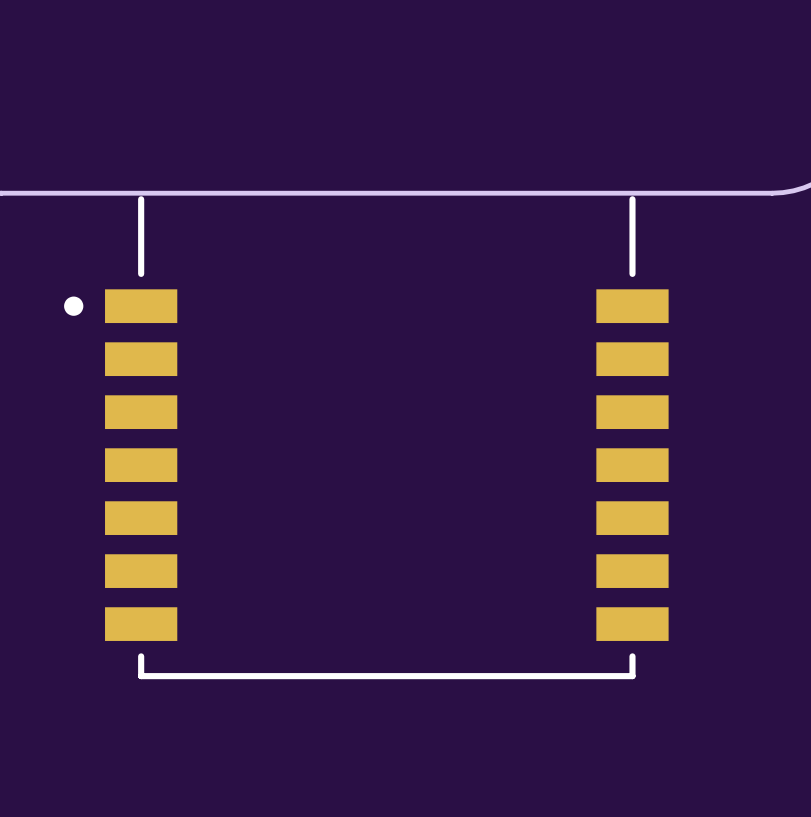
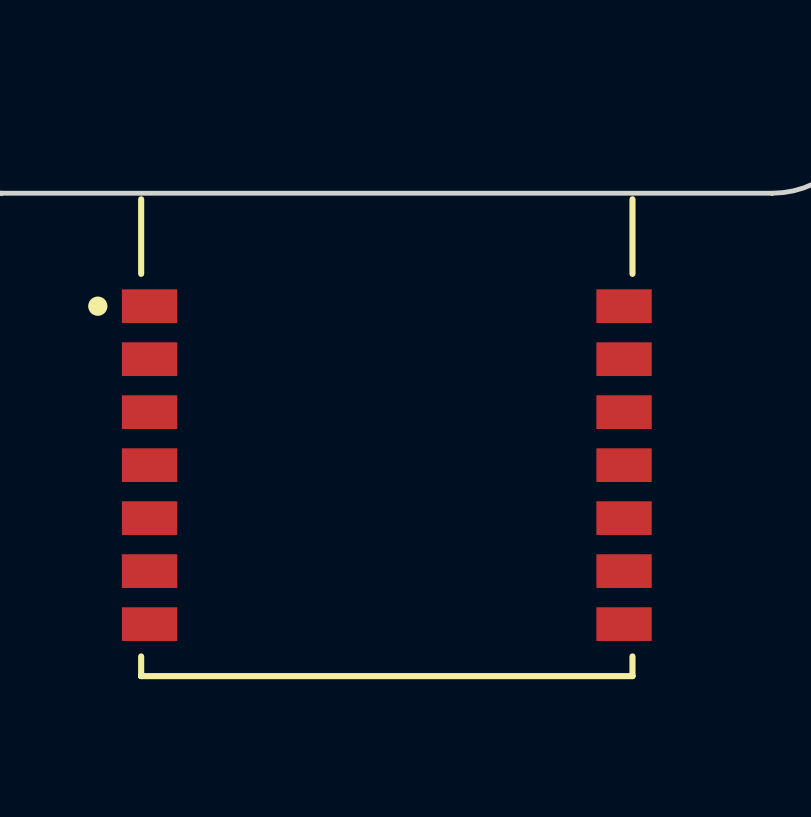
part footprint: [64, 196, 669, 680] -> [88, 196, 652, 680]

